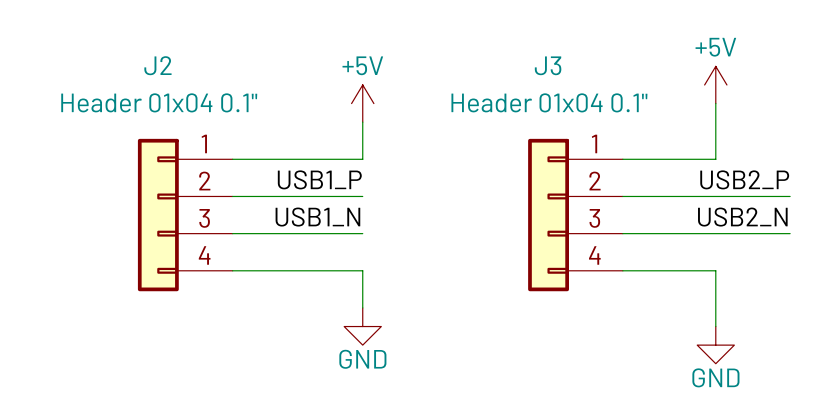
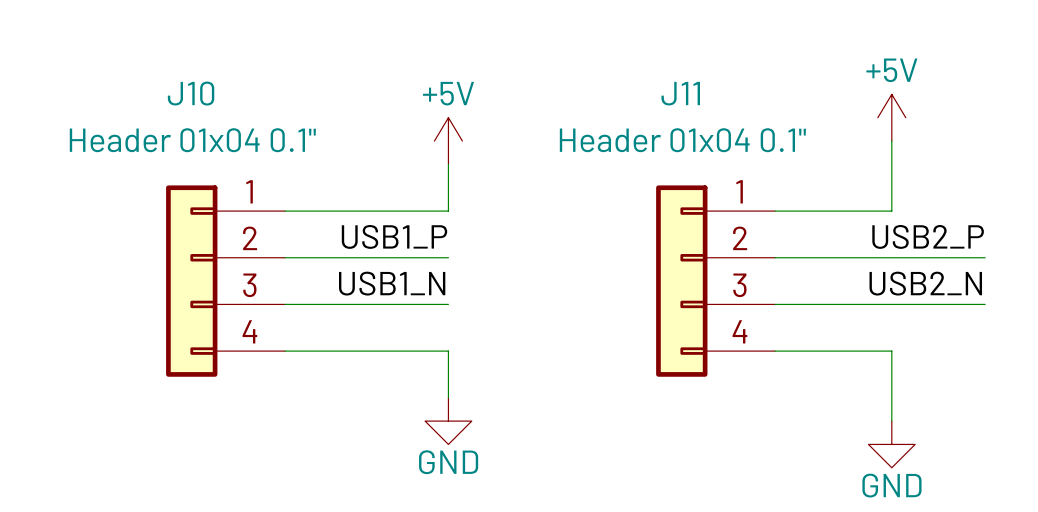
J2 name: J2 (157, 65) -> J10 (191, 93)
J3 name: J3 (548, 65) -> J11 (680, 93)

